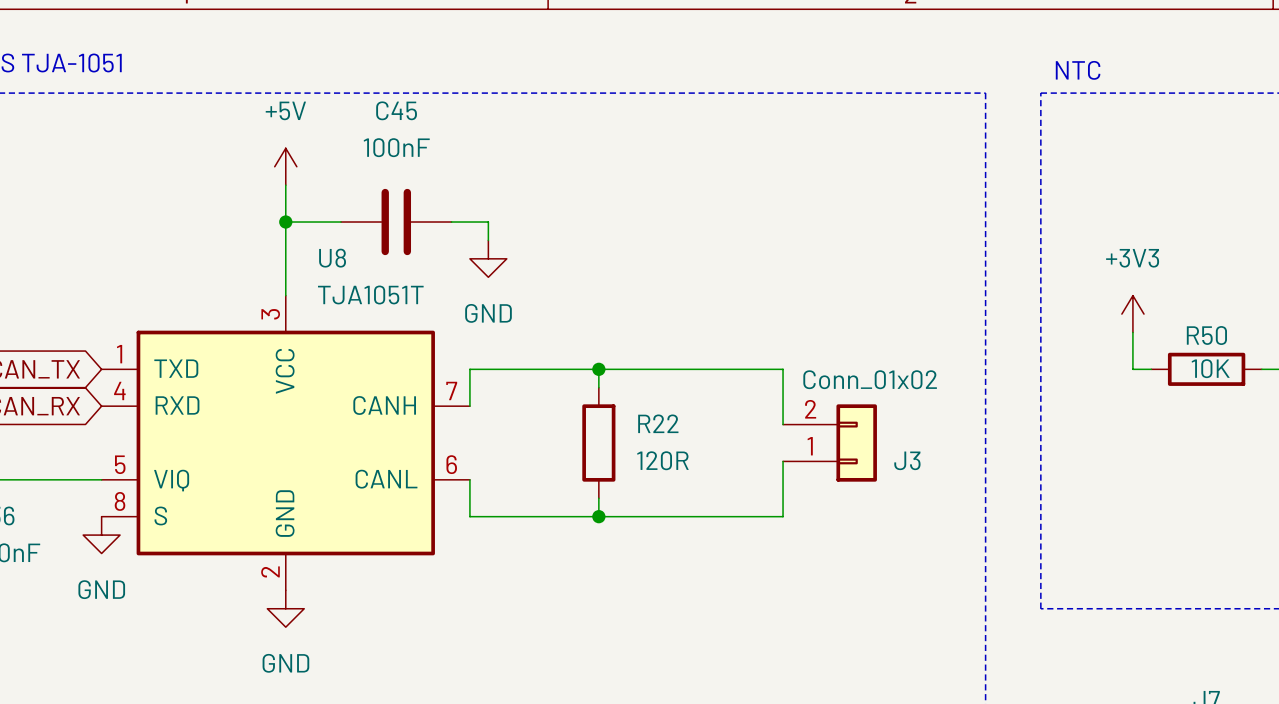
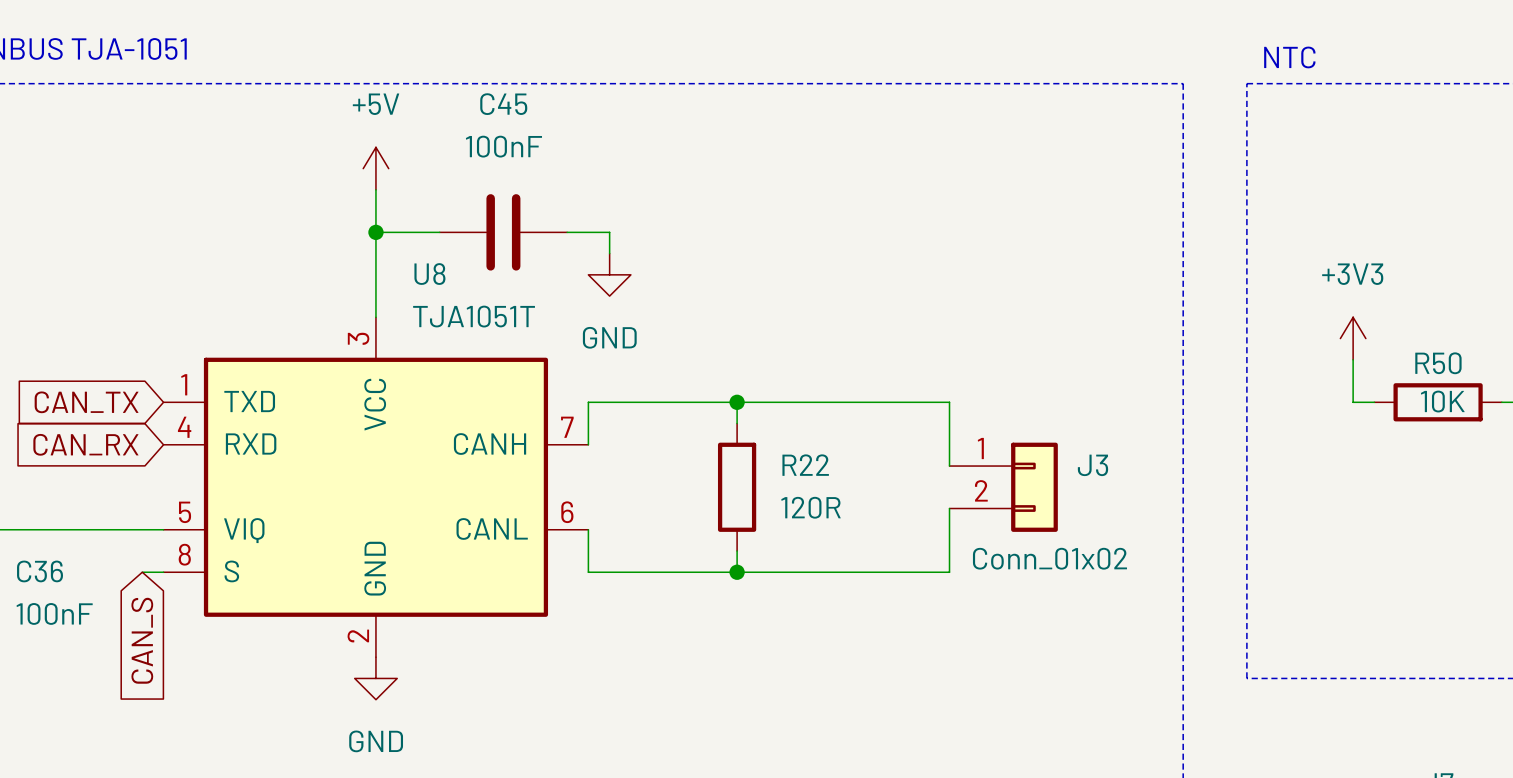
J3 flip: as is (856, 443) -> up-down (1034, 487)
wire: none -> (142, 572) (163, 572)
power symbol: GND (101, 535) -> none
global label: none -> CAN_S (142, 640)

